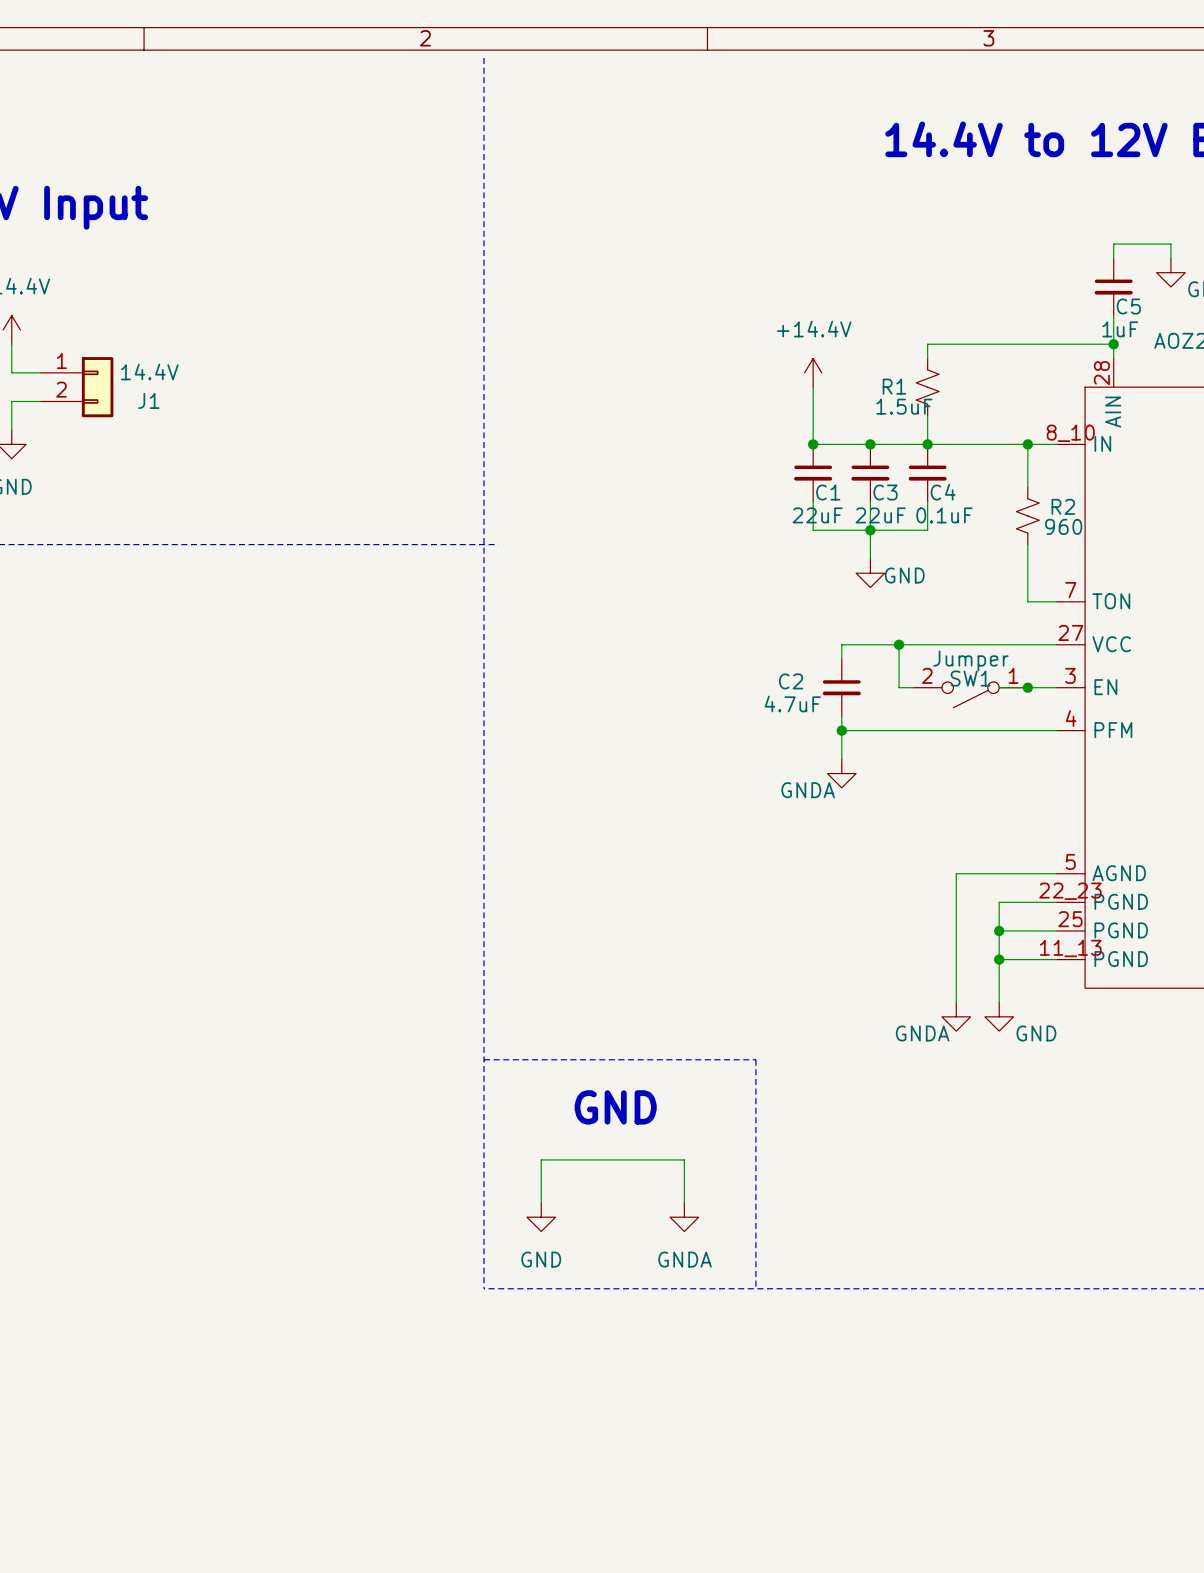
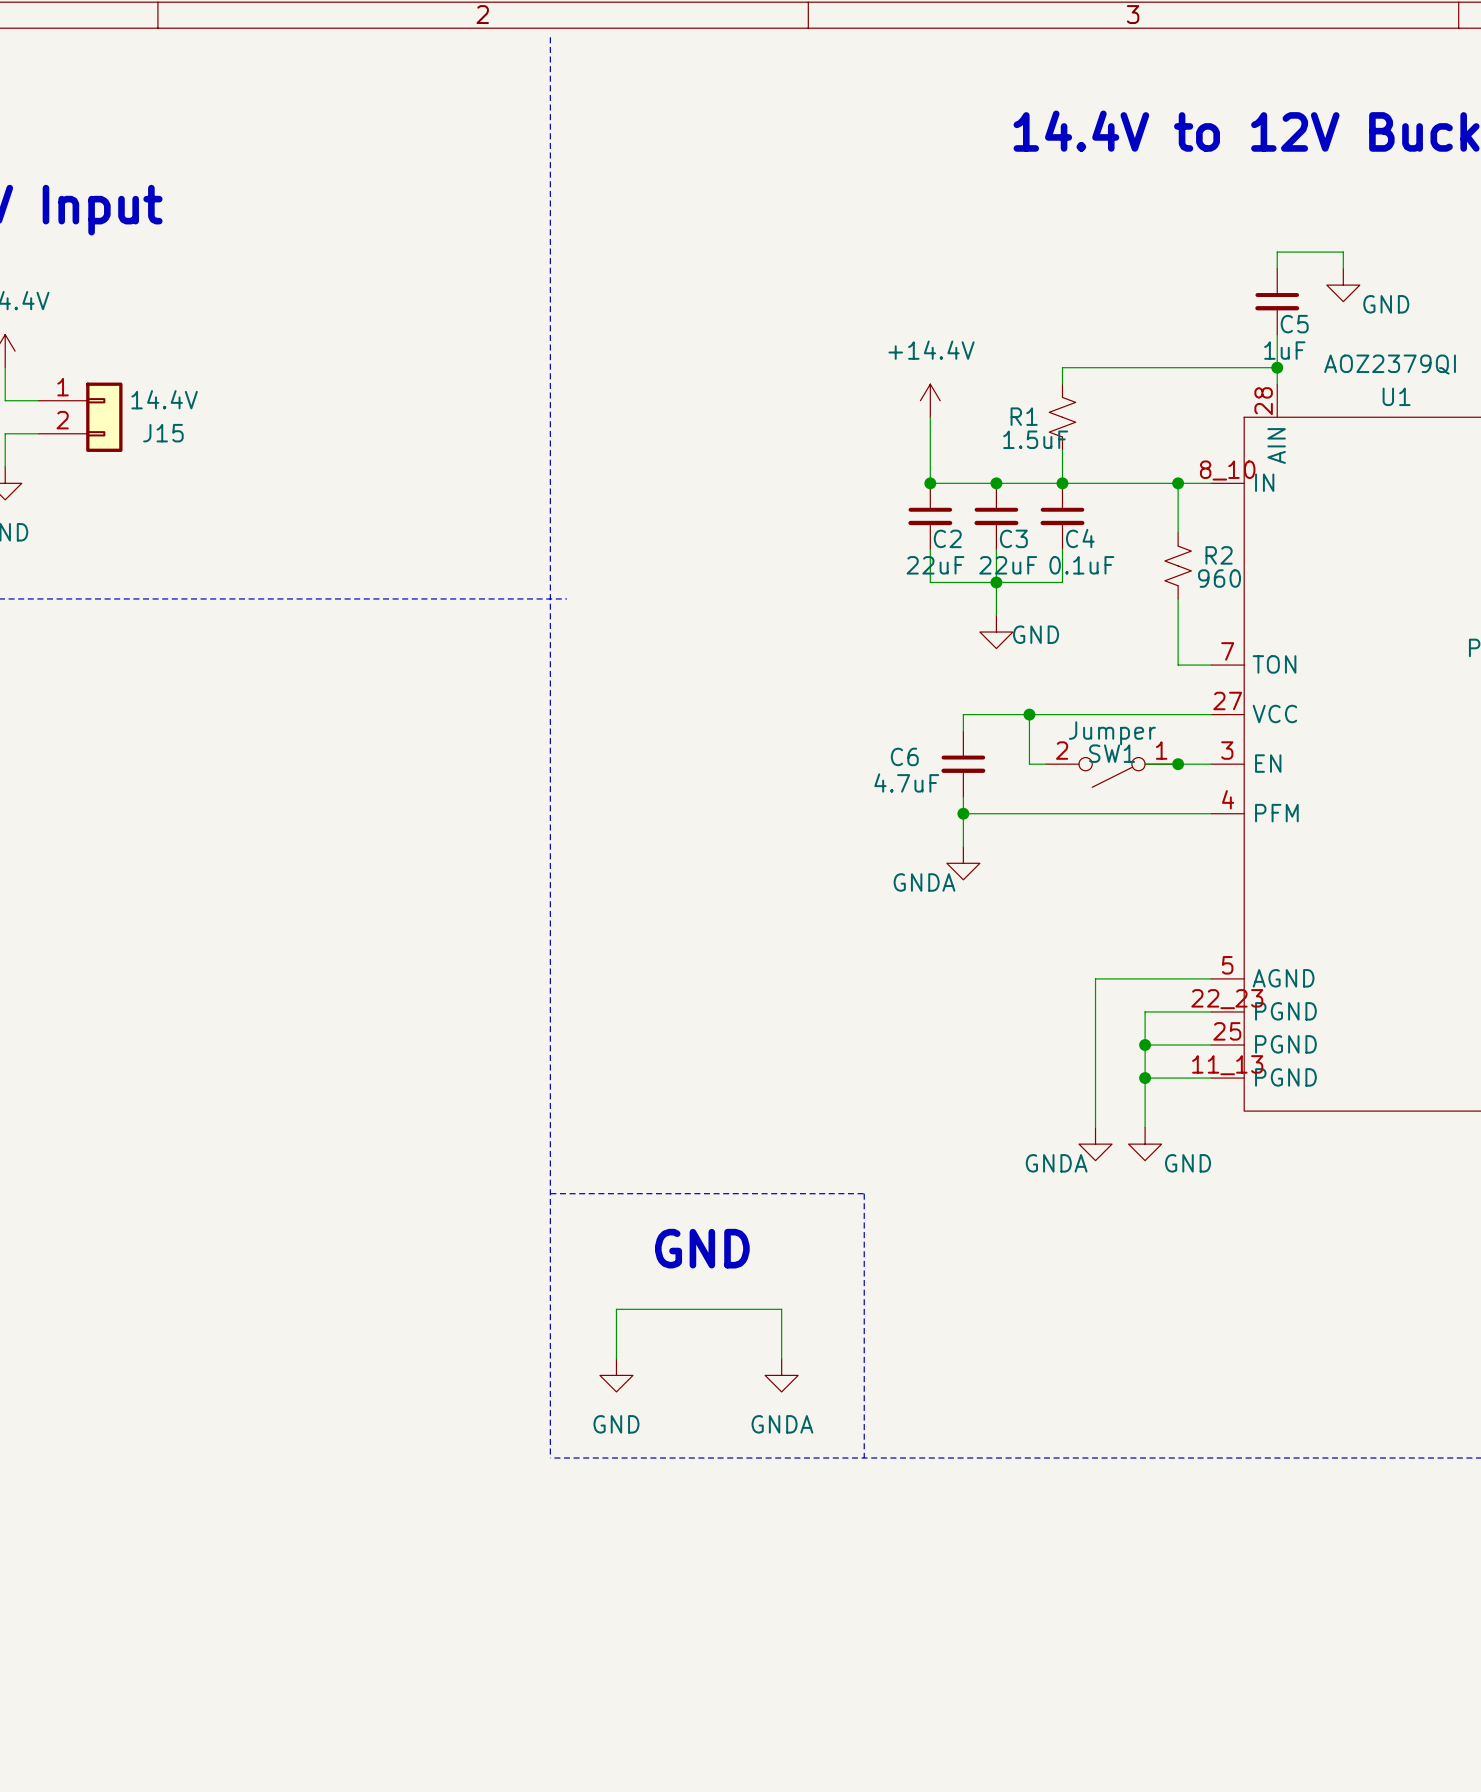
J1 name: J1 (148, 400) -> J15 (163, 433)
C1 name: C1 (828, 492) -> C2 (947, 538)
C2 name: C2 (791, 681) -> C6 (904, 756)

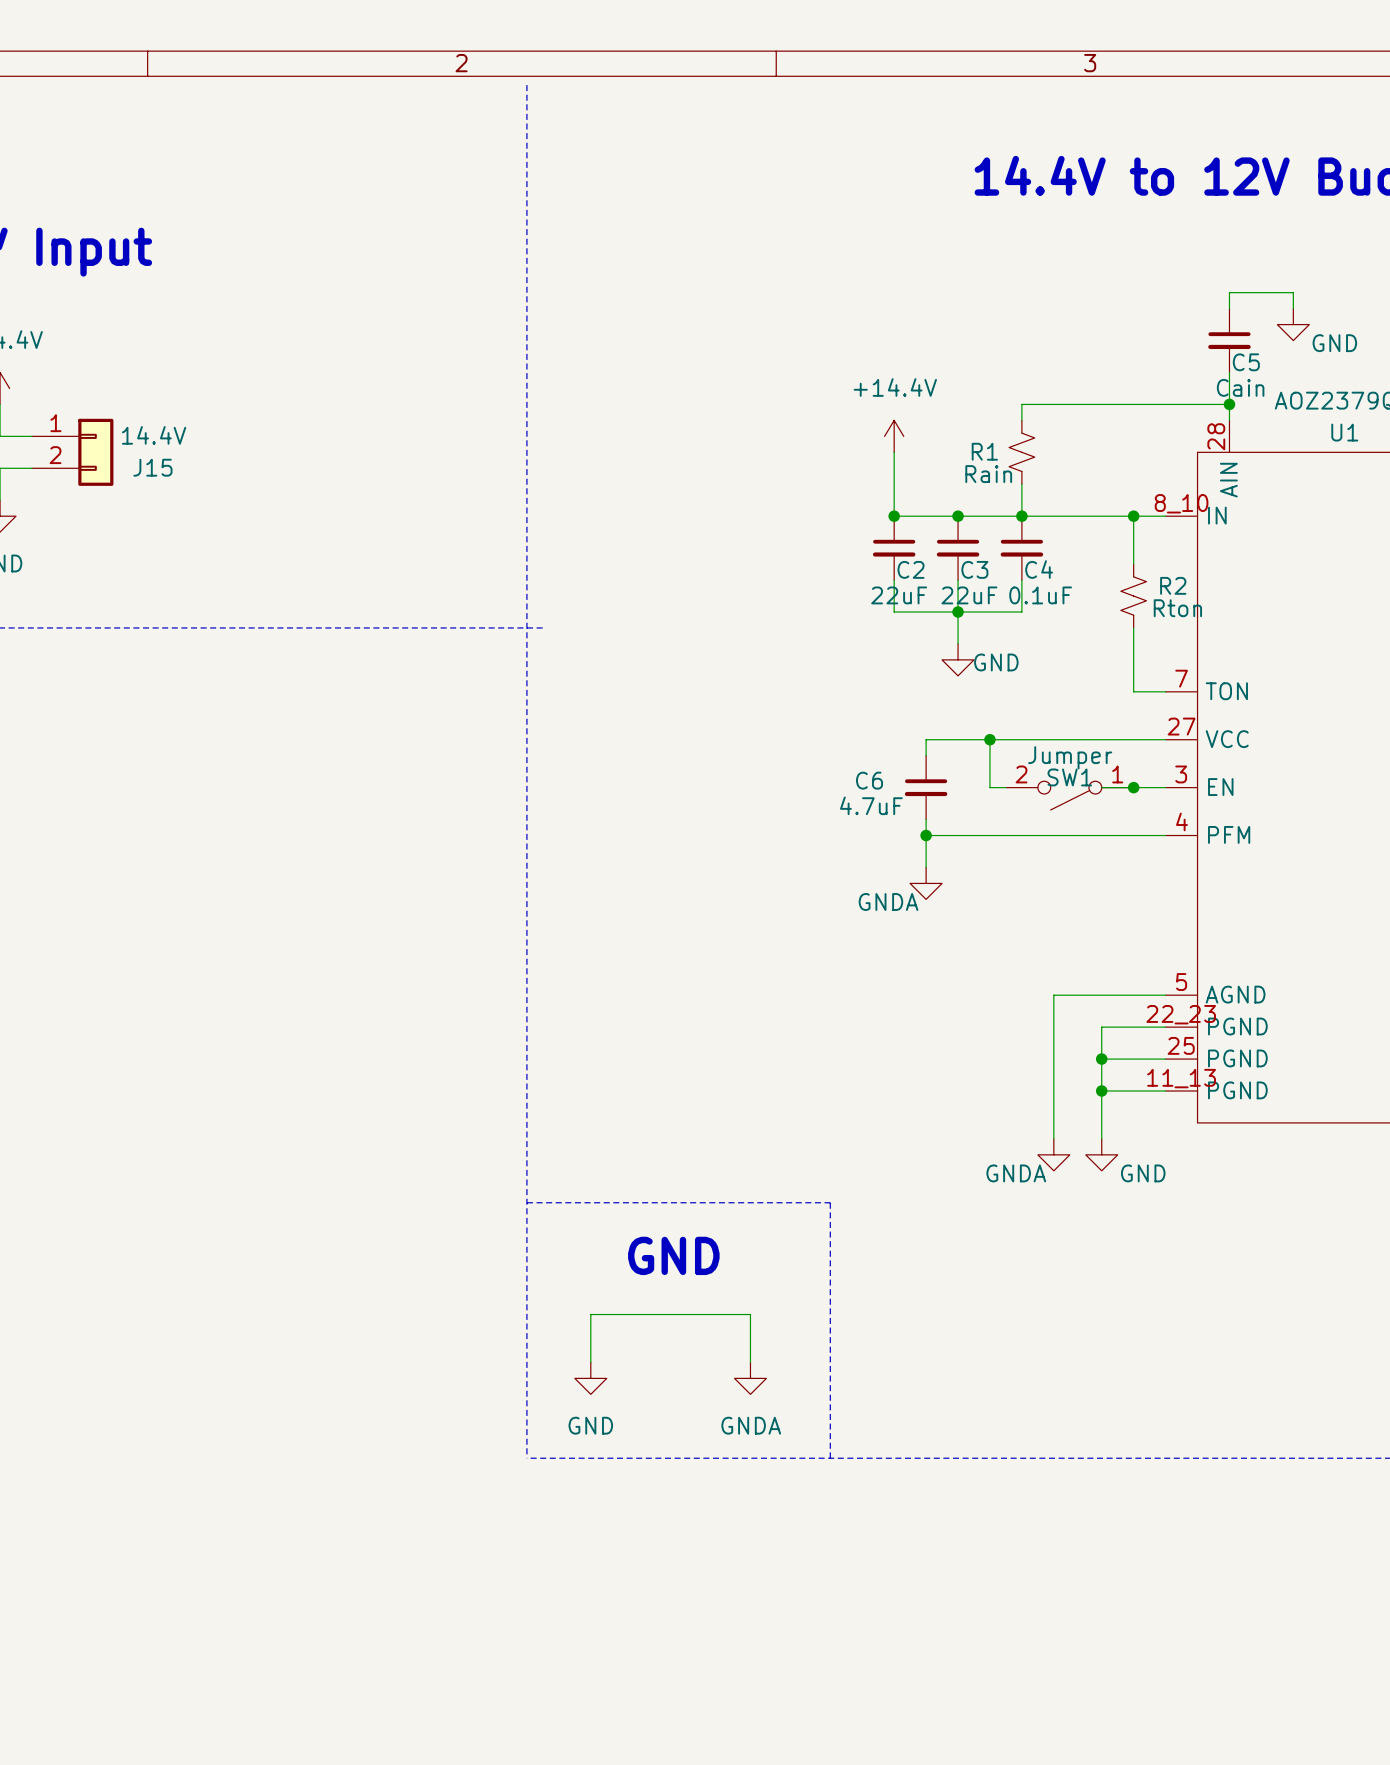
C5 value: 1uF (1284, 350) -> Cain (1240, 387)
R1 value: 1.5uF (1035, 439) -> Rain (988, 474)
R2 value: 960 (1219, 578) -> Rton (1177, 608)

